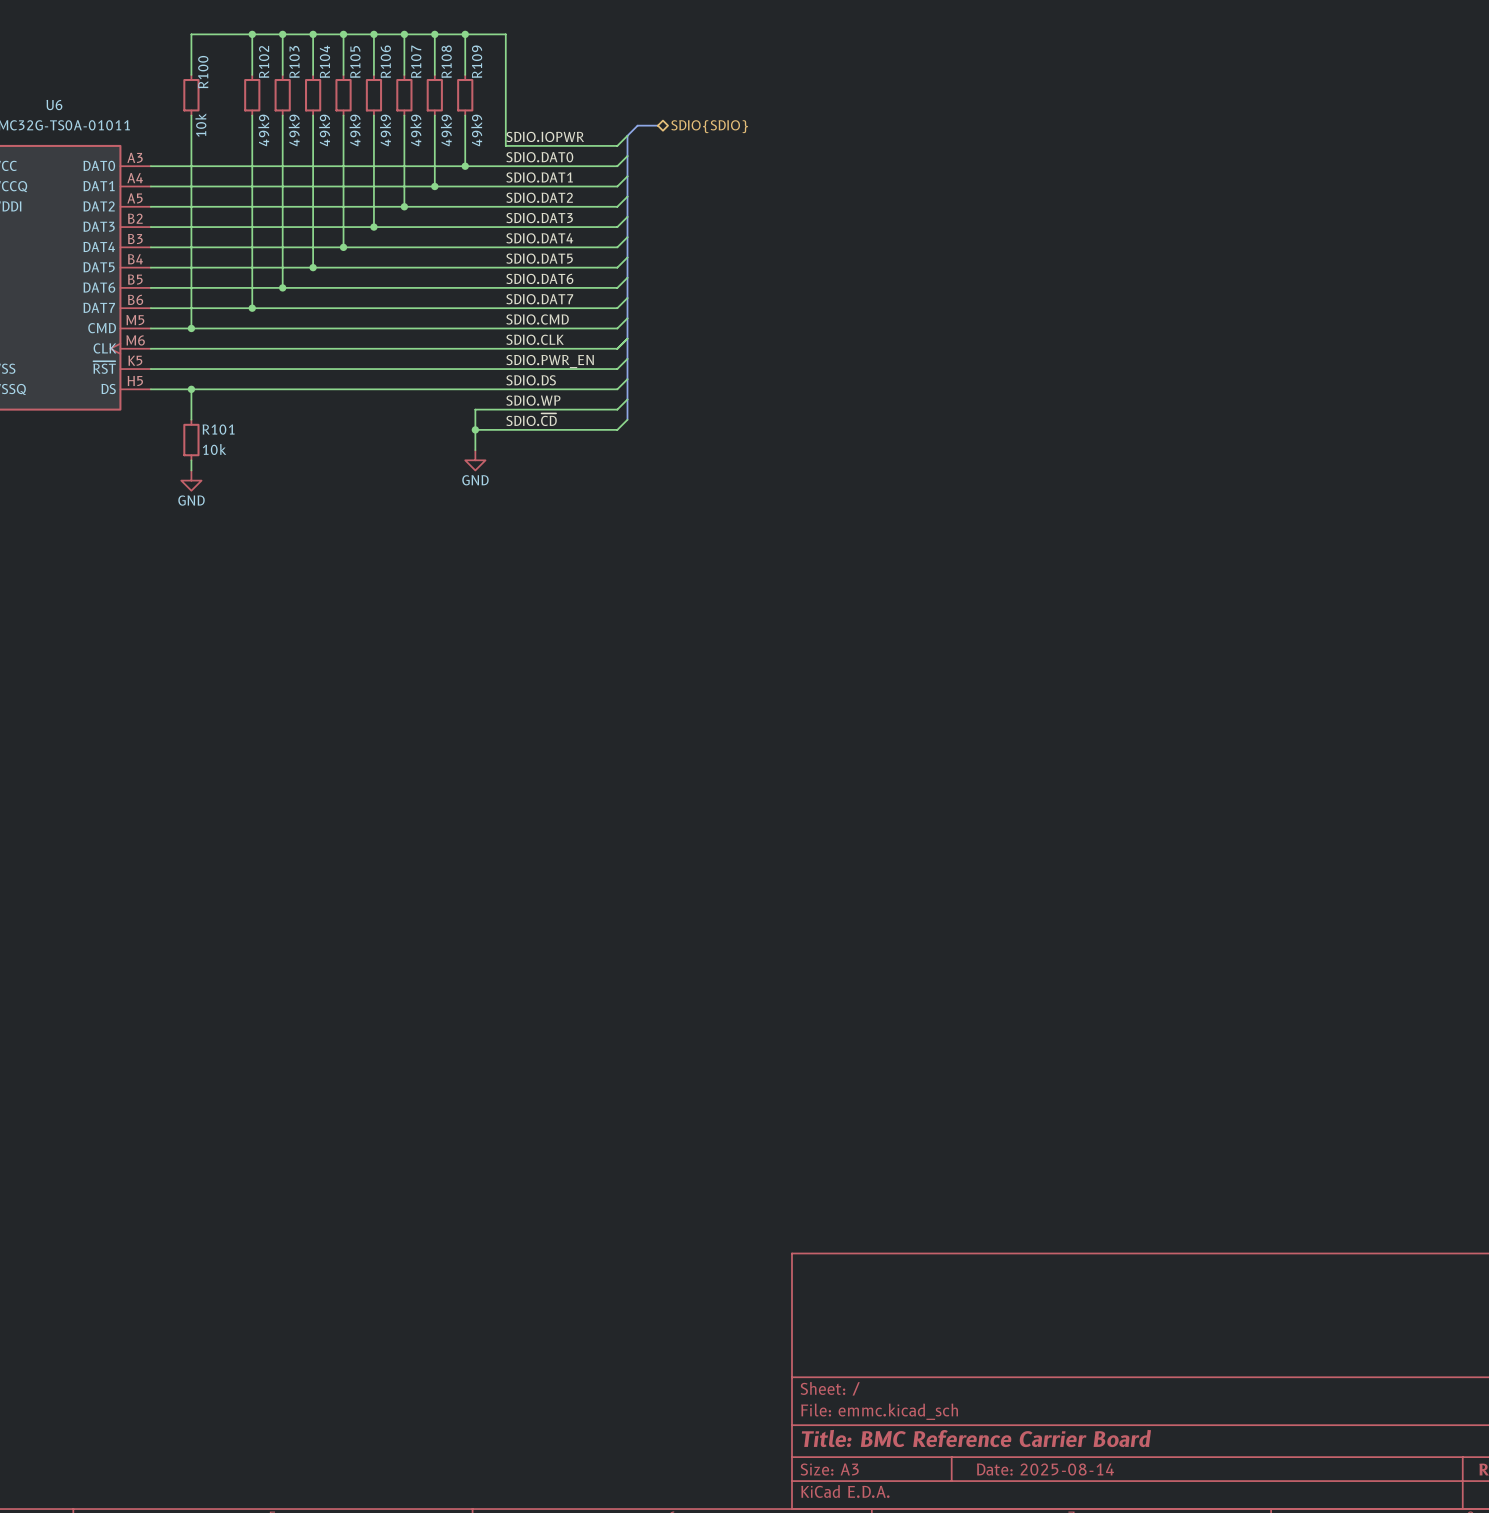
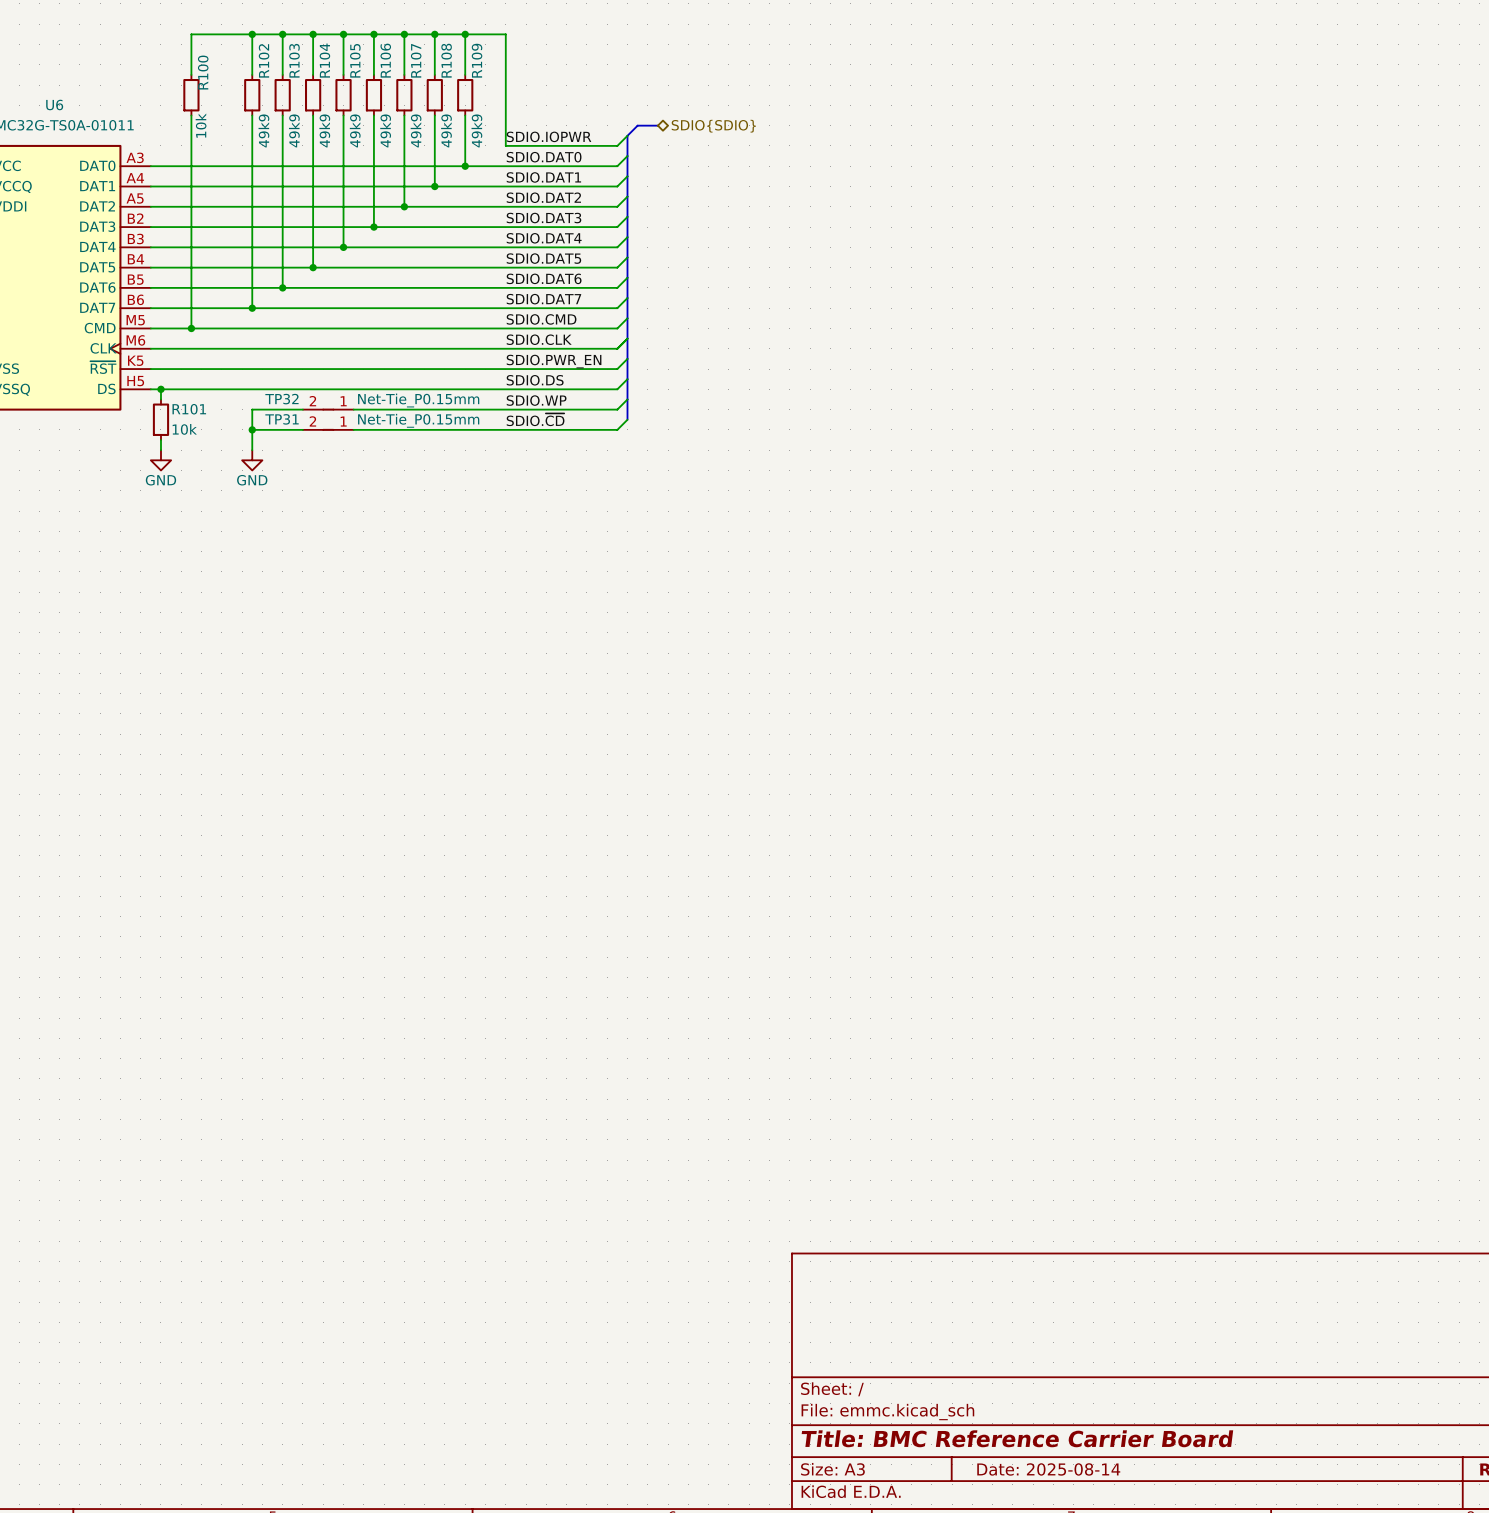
wire: none -> (160, 389) (160, 399)
wire: (191, 389) (191, 419) -> none
junction position: (191, 389) -> (160, 389)
wire: none -> (302, 409) (252, 409) (252, 450)
TP32: none -> Net-Tie_P0.15mm (328, 409)
wire: (475, 409) (475, 450) -> (475, 409) (353, 409)
wire: none -> (252, 429) (302, 429)
junction: none -> (252, 429)
TP31: none -> Net-Tie_P0.15mm (328, 429)
wire: none -> (353, 429) (475, 429)
junction: (475, 429) -> none
R101 position: (191, 440) -> (160, 419)
power symbol: none -> GND (160, 460)
wire: (191, 460) (191, 470) -> (160, 440) (160, 450)
power symbol: none -> GND (252, 460)
power symbol: GND (475, 460) -> none
power symbol: GND (191, 480) -> none

